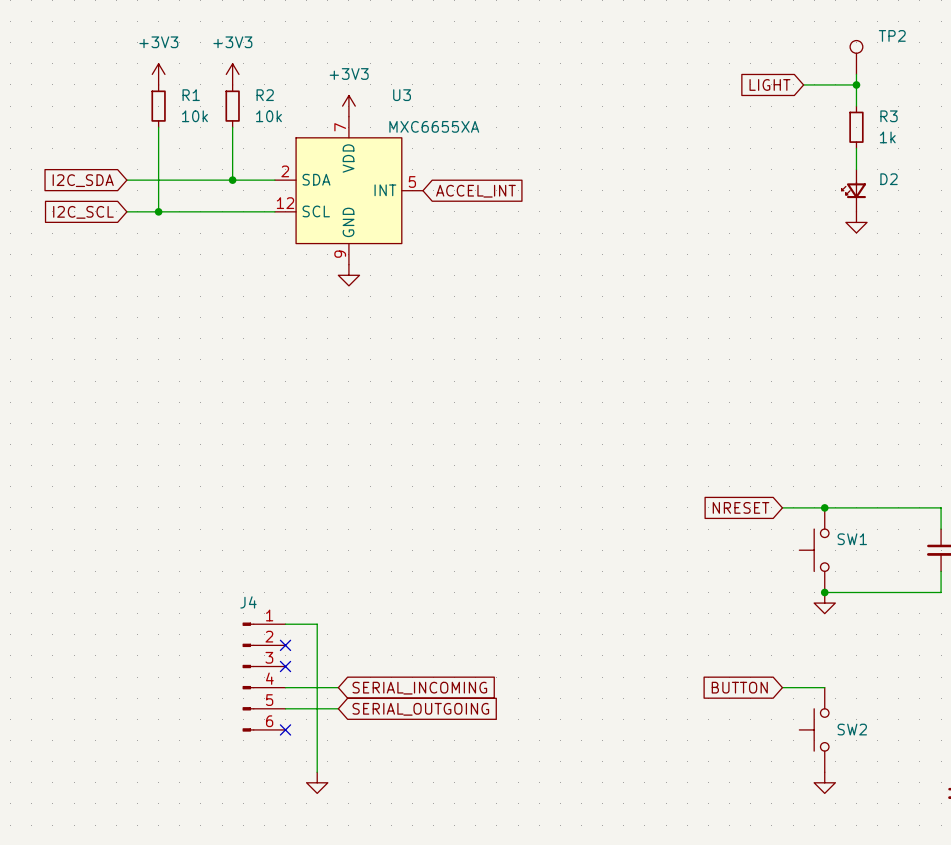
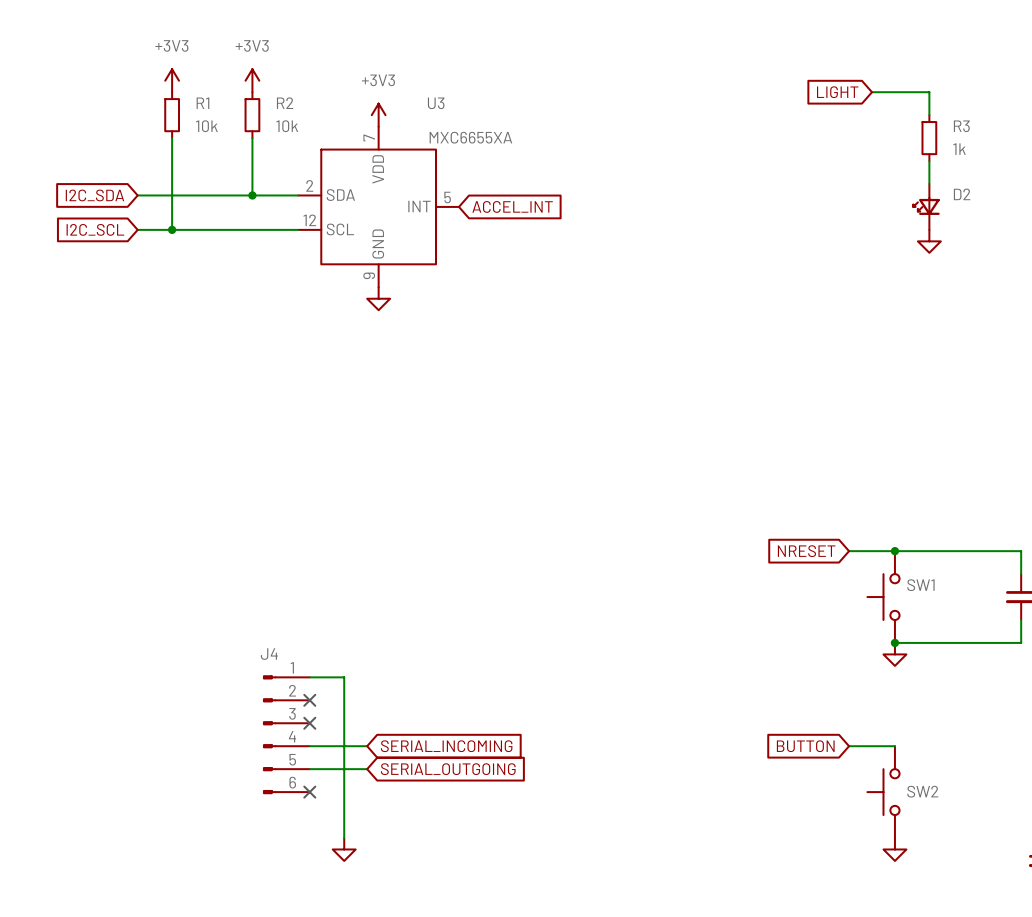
TP2: (856, 57) -> none
wire: (856, 74) (856, 84) -> none
junction: (856, 84) -> none

